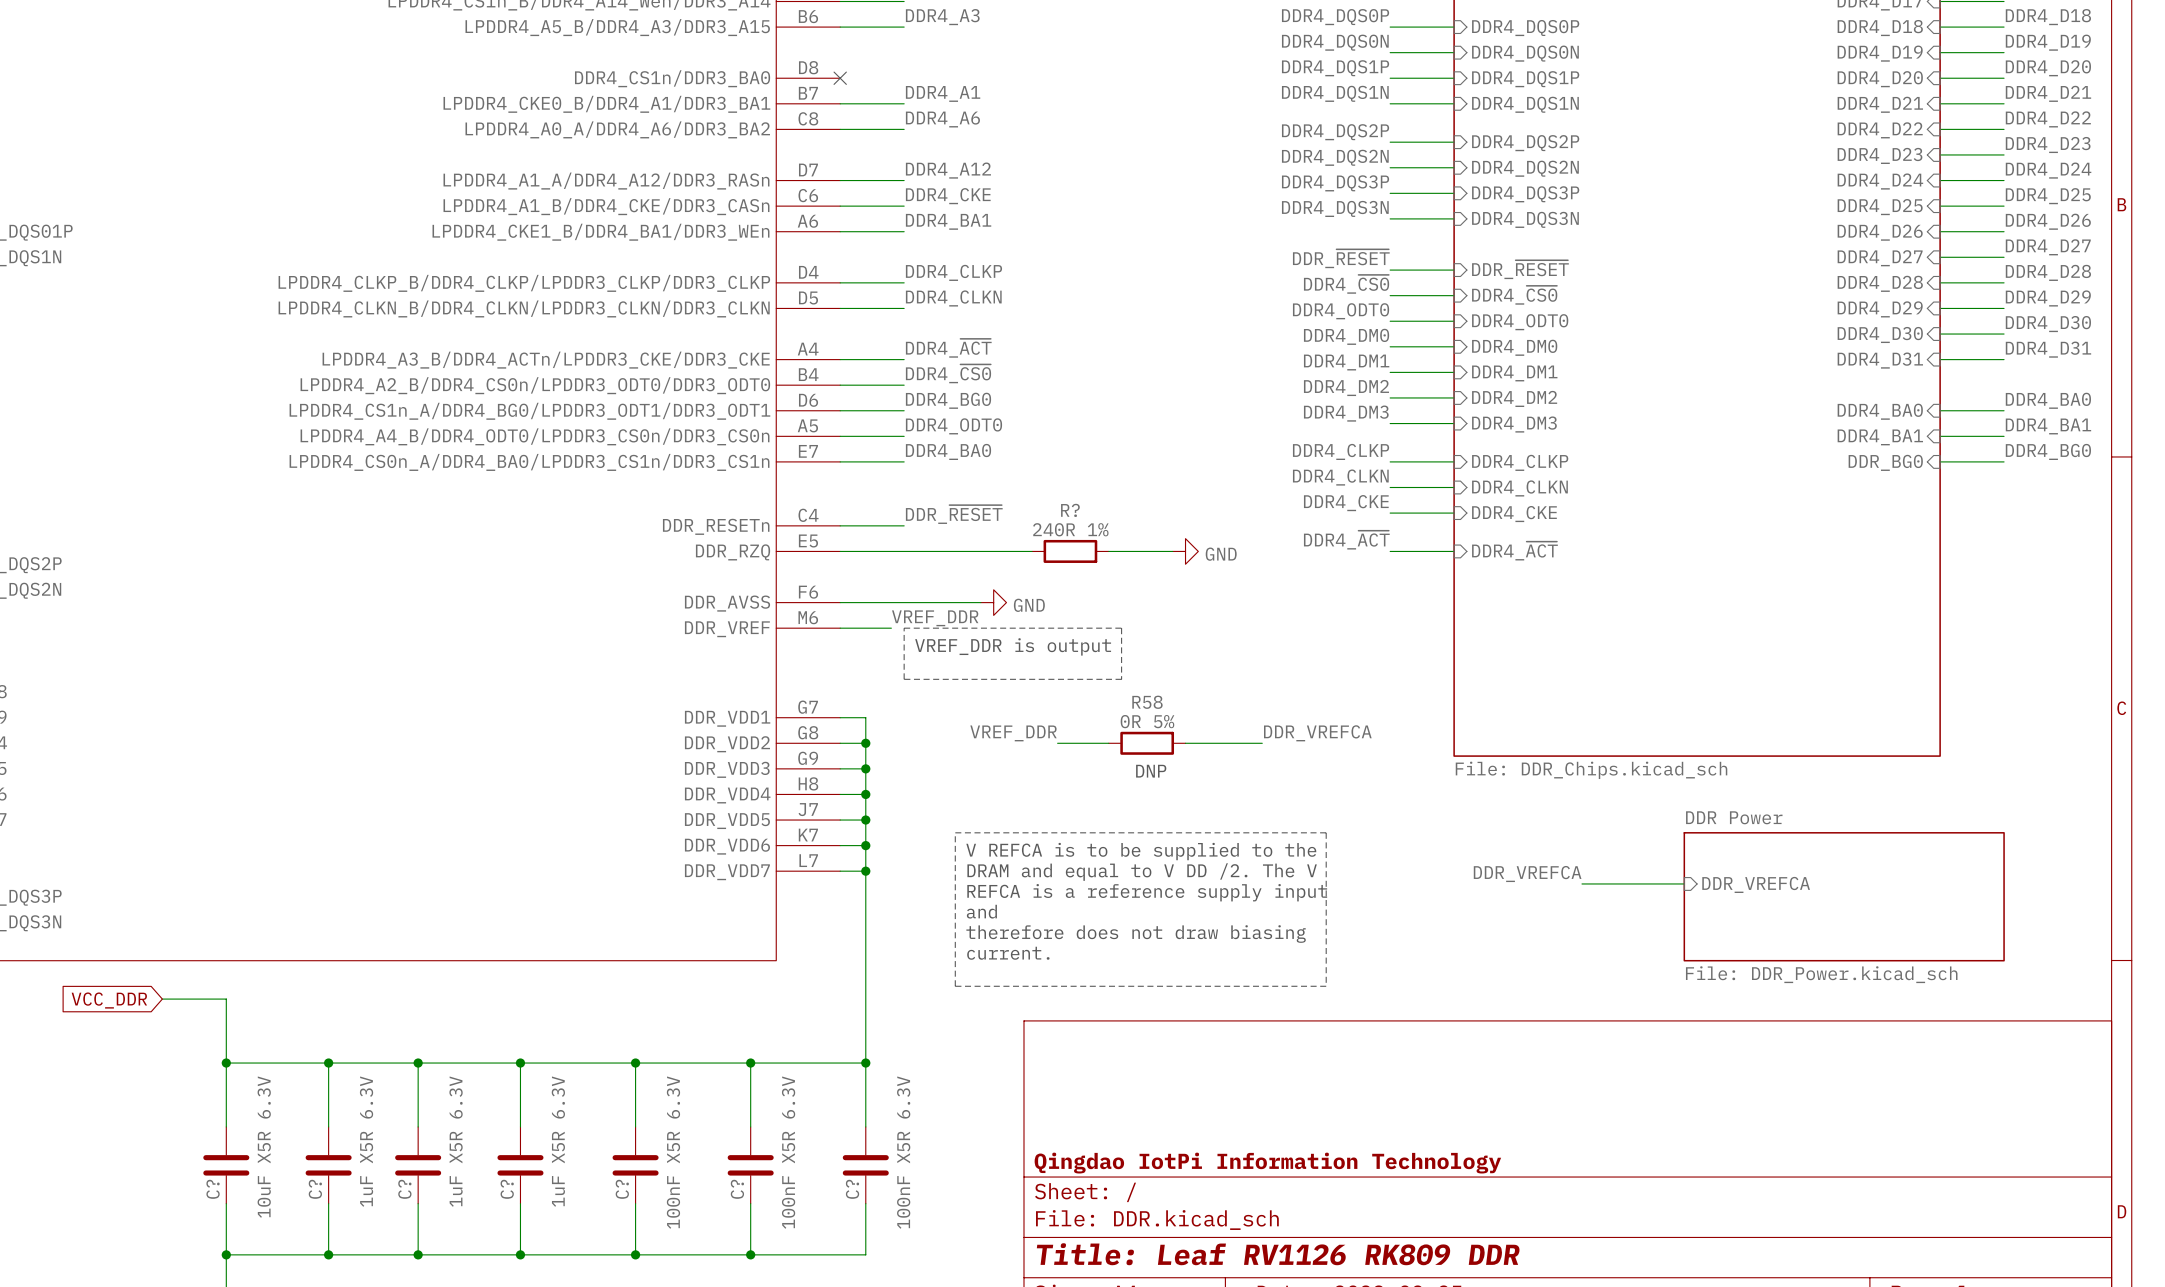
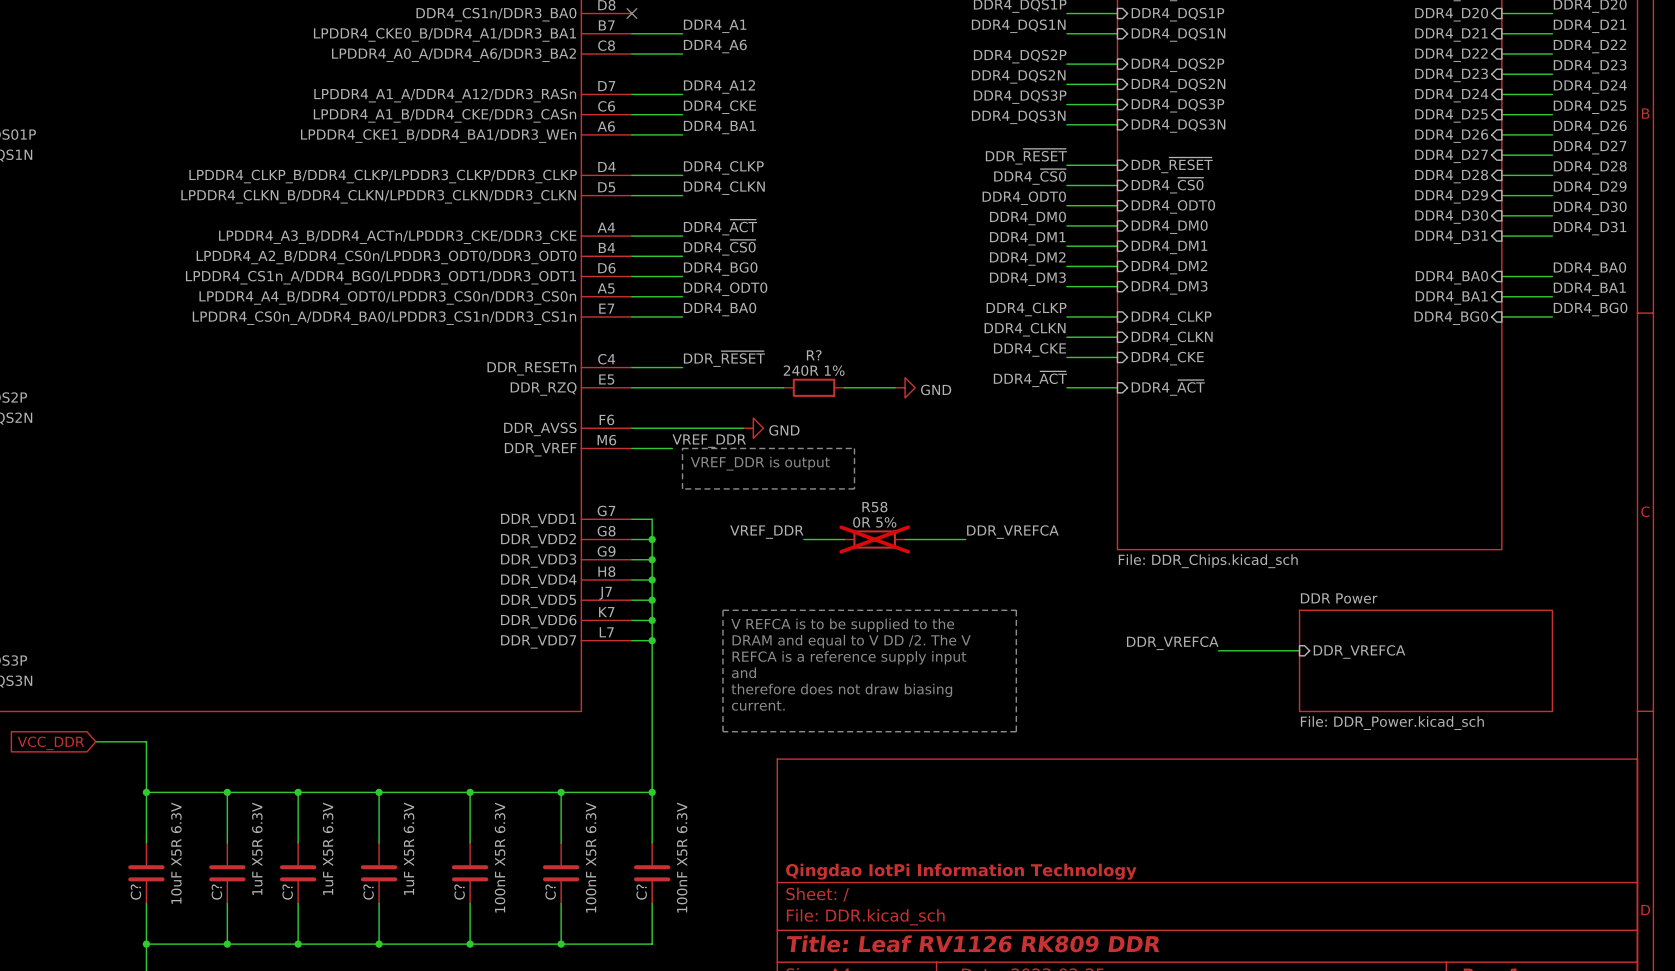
sheet pin: DDR_BG0 (1885, 462) -> DDR4_BG0 (1451, 318)
R58 do-not-place cross: none -> (874, 539)
text: DNP (1151, 771) -> none

